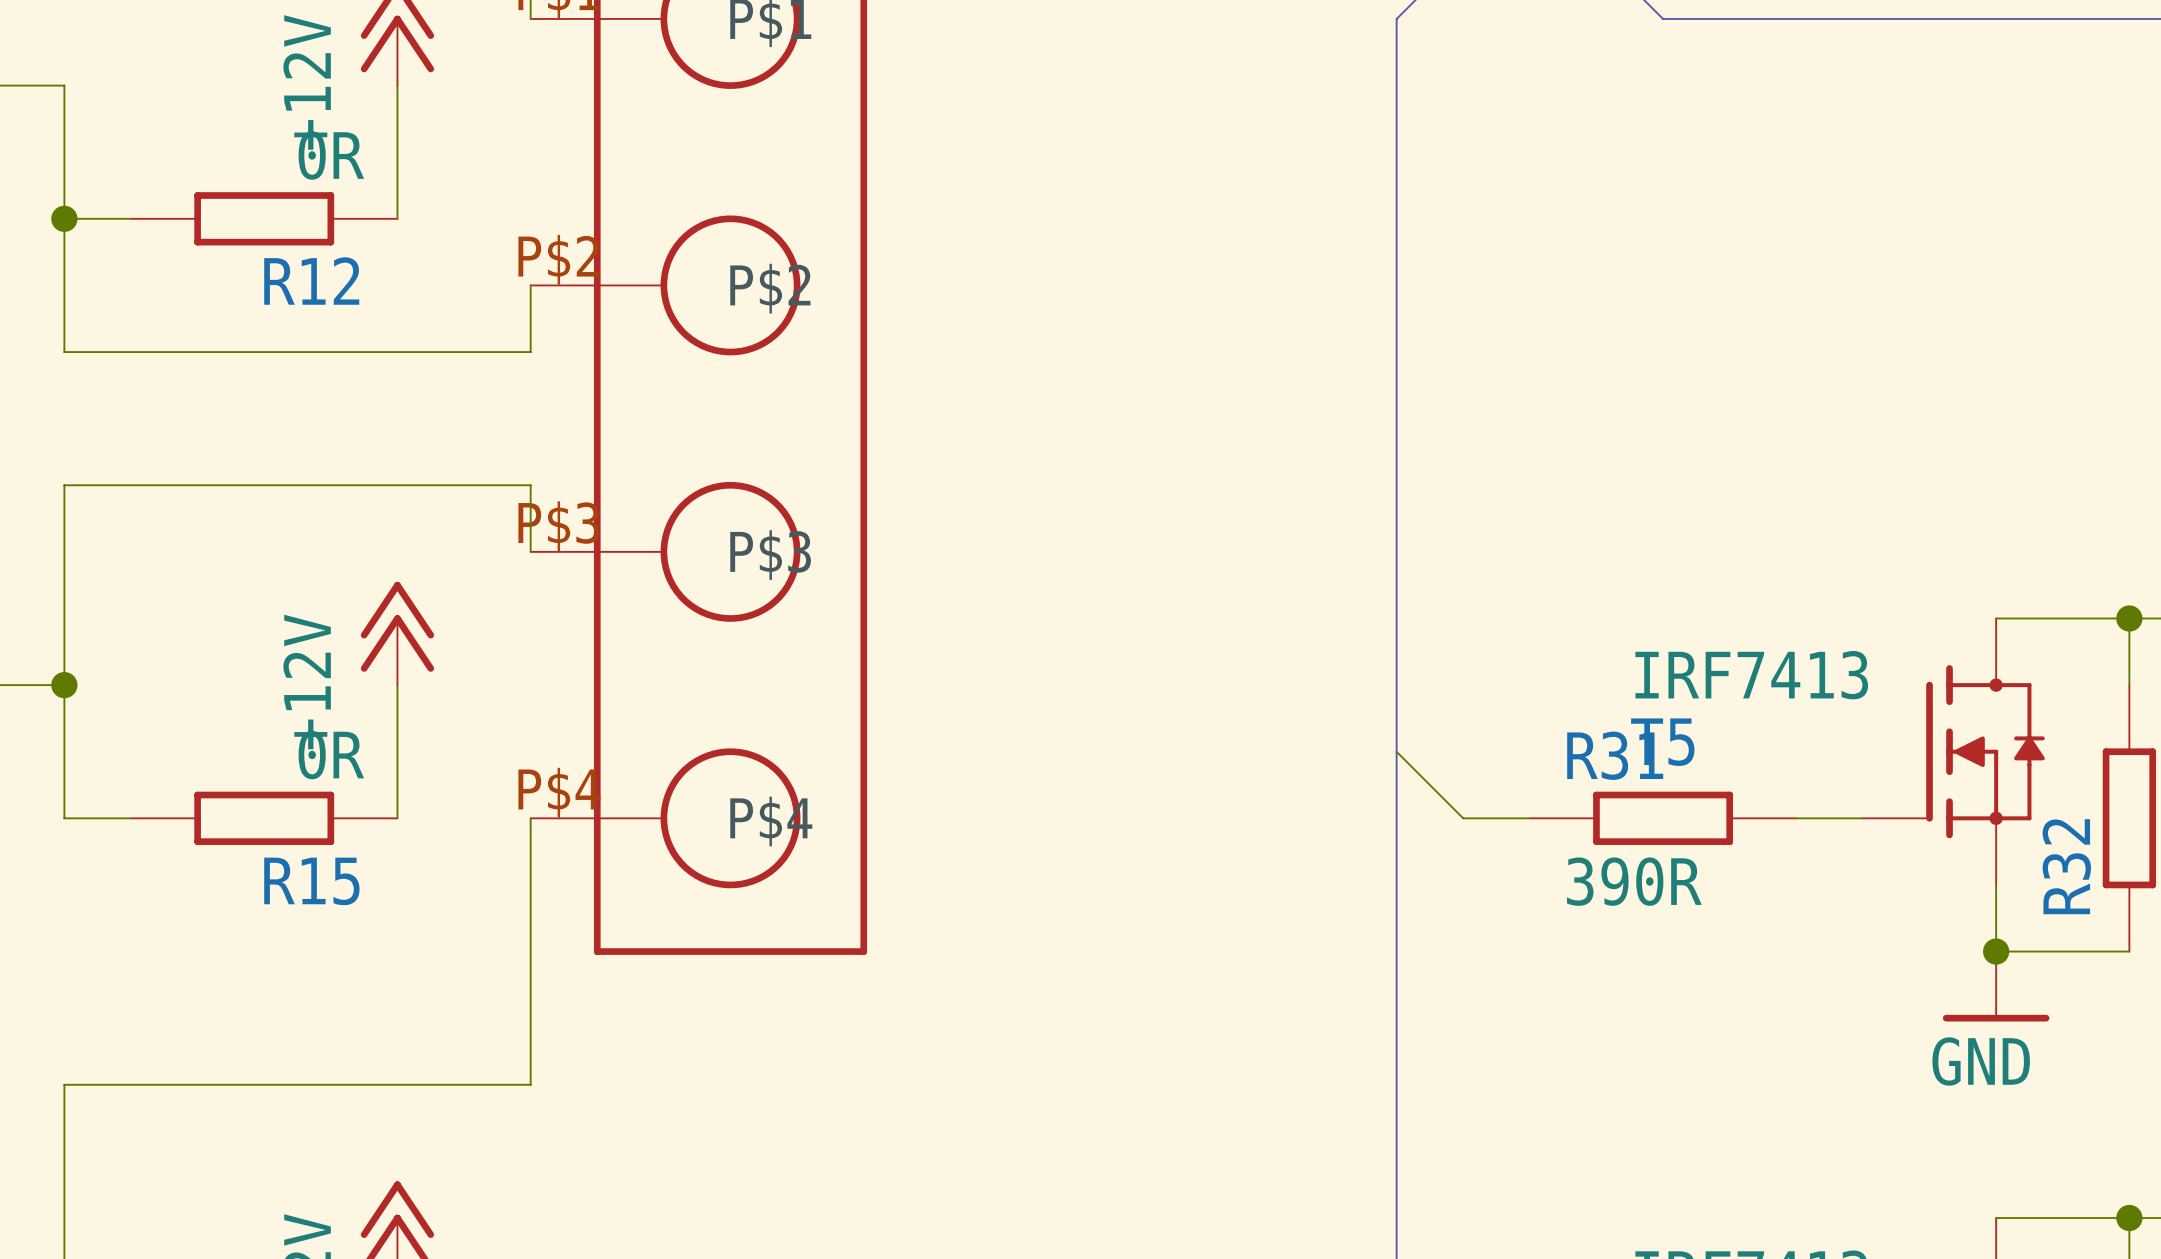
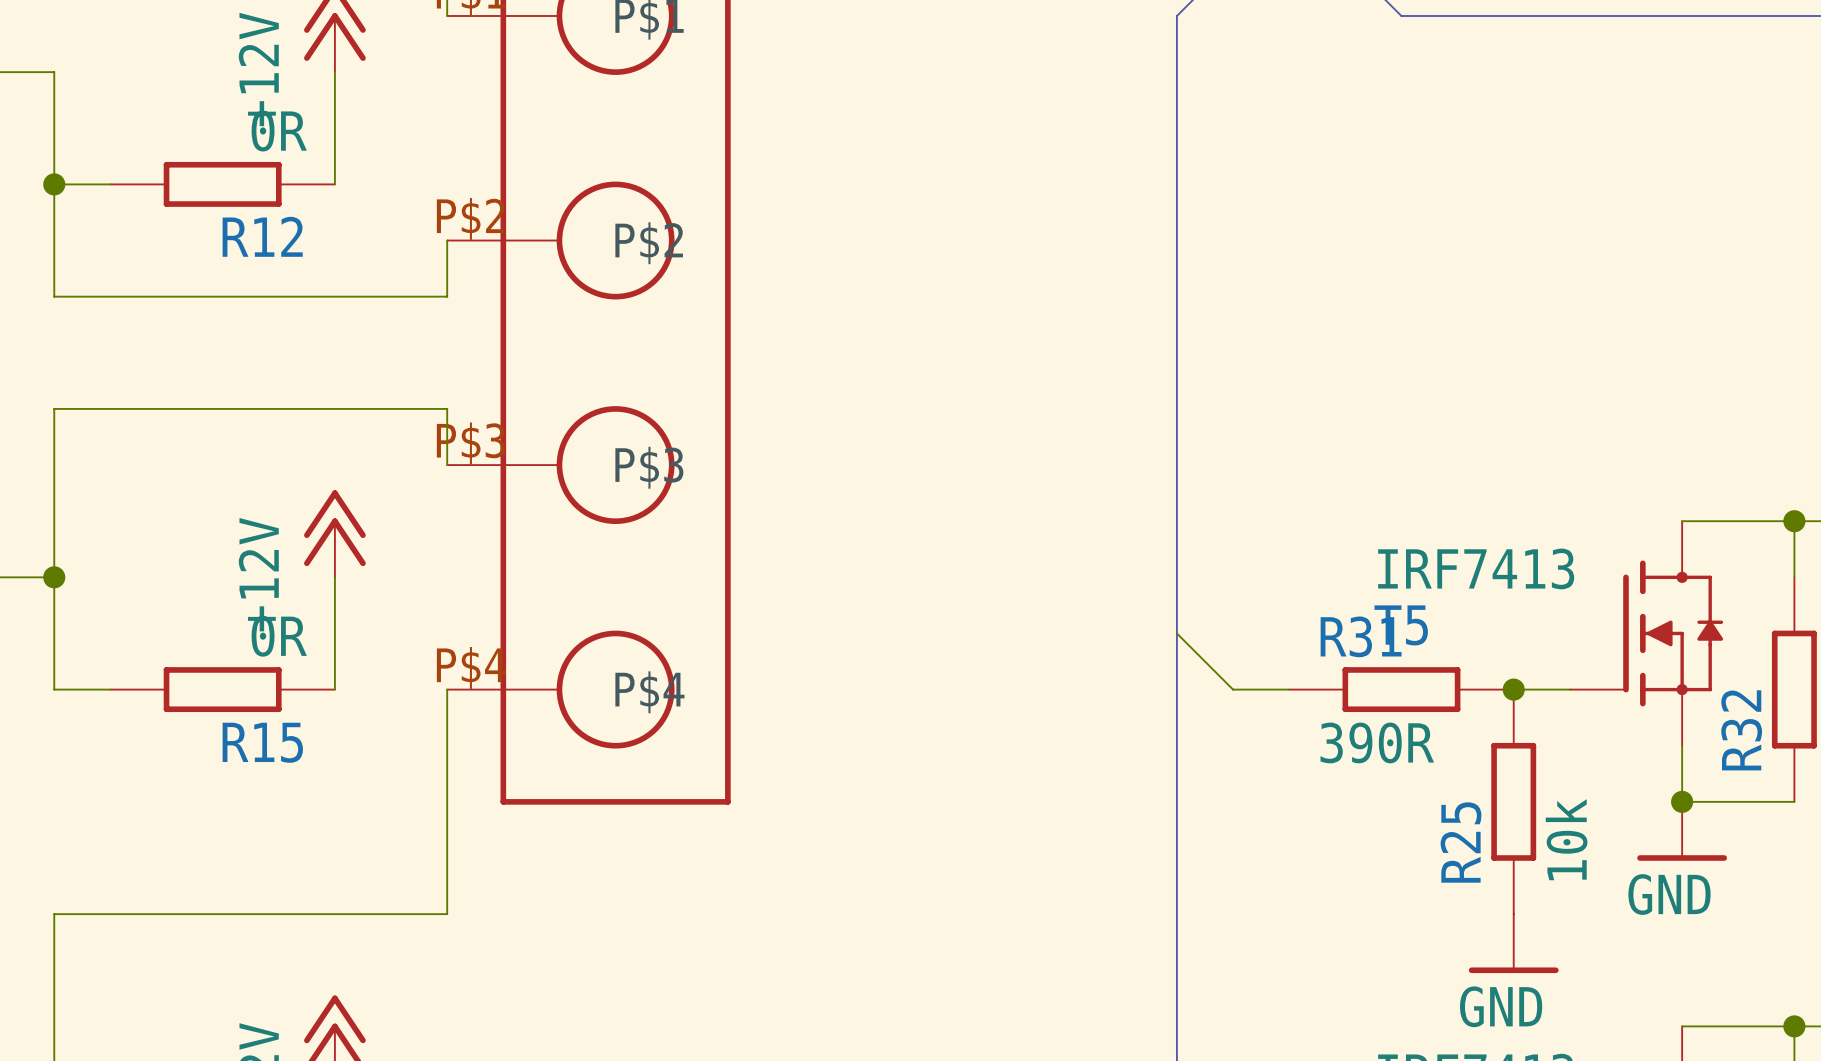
junction: none -> (1513, 689)
R25: none -> 10k (1513, 801)
power symbol: none -> GND (1513, 943)

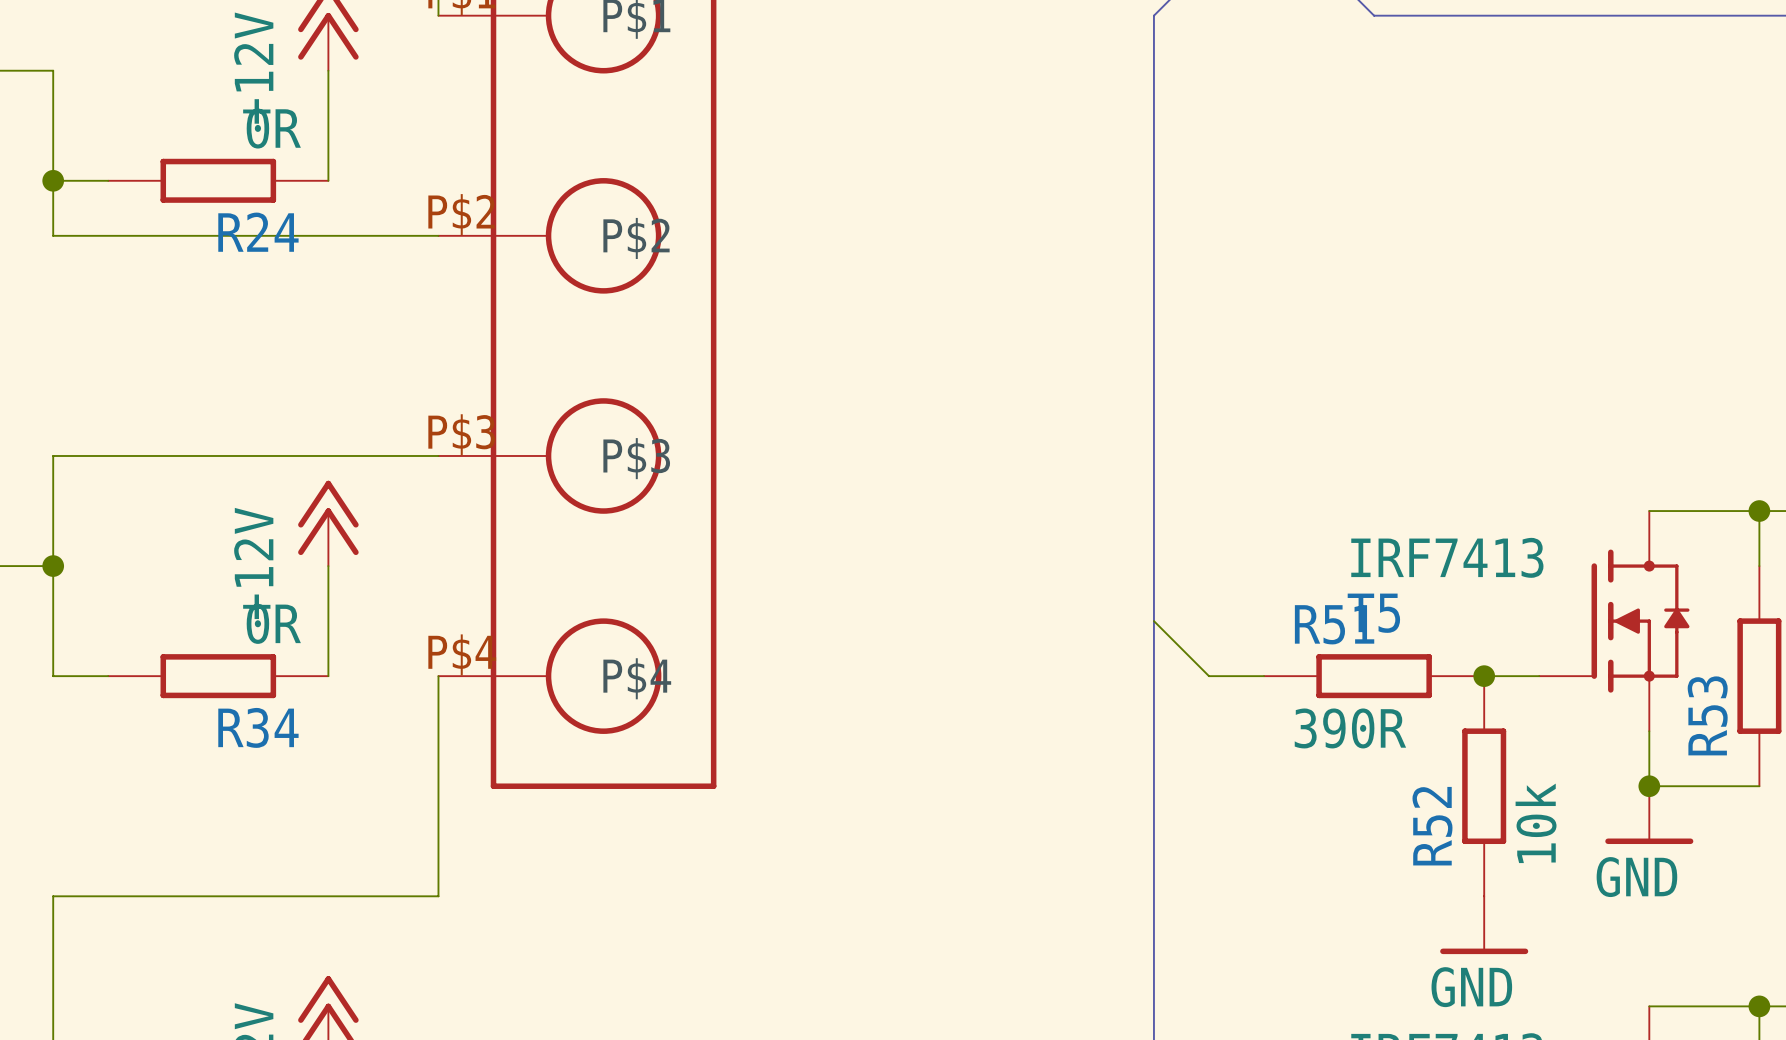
R12 name: R12 (262, 236) -> R24 (258, 232)
wire: (54, 240) (54, 296) (447, 296) (447, 240) -> (53, 235) (438, 235)
wire: (54, 465) (54, 408) (447, 408) (447, 465) -> (53, 455) (438, 455)
R31 name: R31 (1361, 636) -> R51 (1334, 624)
R32 name: R32 (1741, 730) -> R53 (1707, 715)
R15 name: R15 (262, 742) -> R34 (258, 727)
R25 name: R25 (1460, 842) -> R52 (1432, 826)

